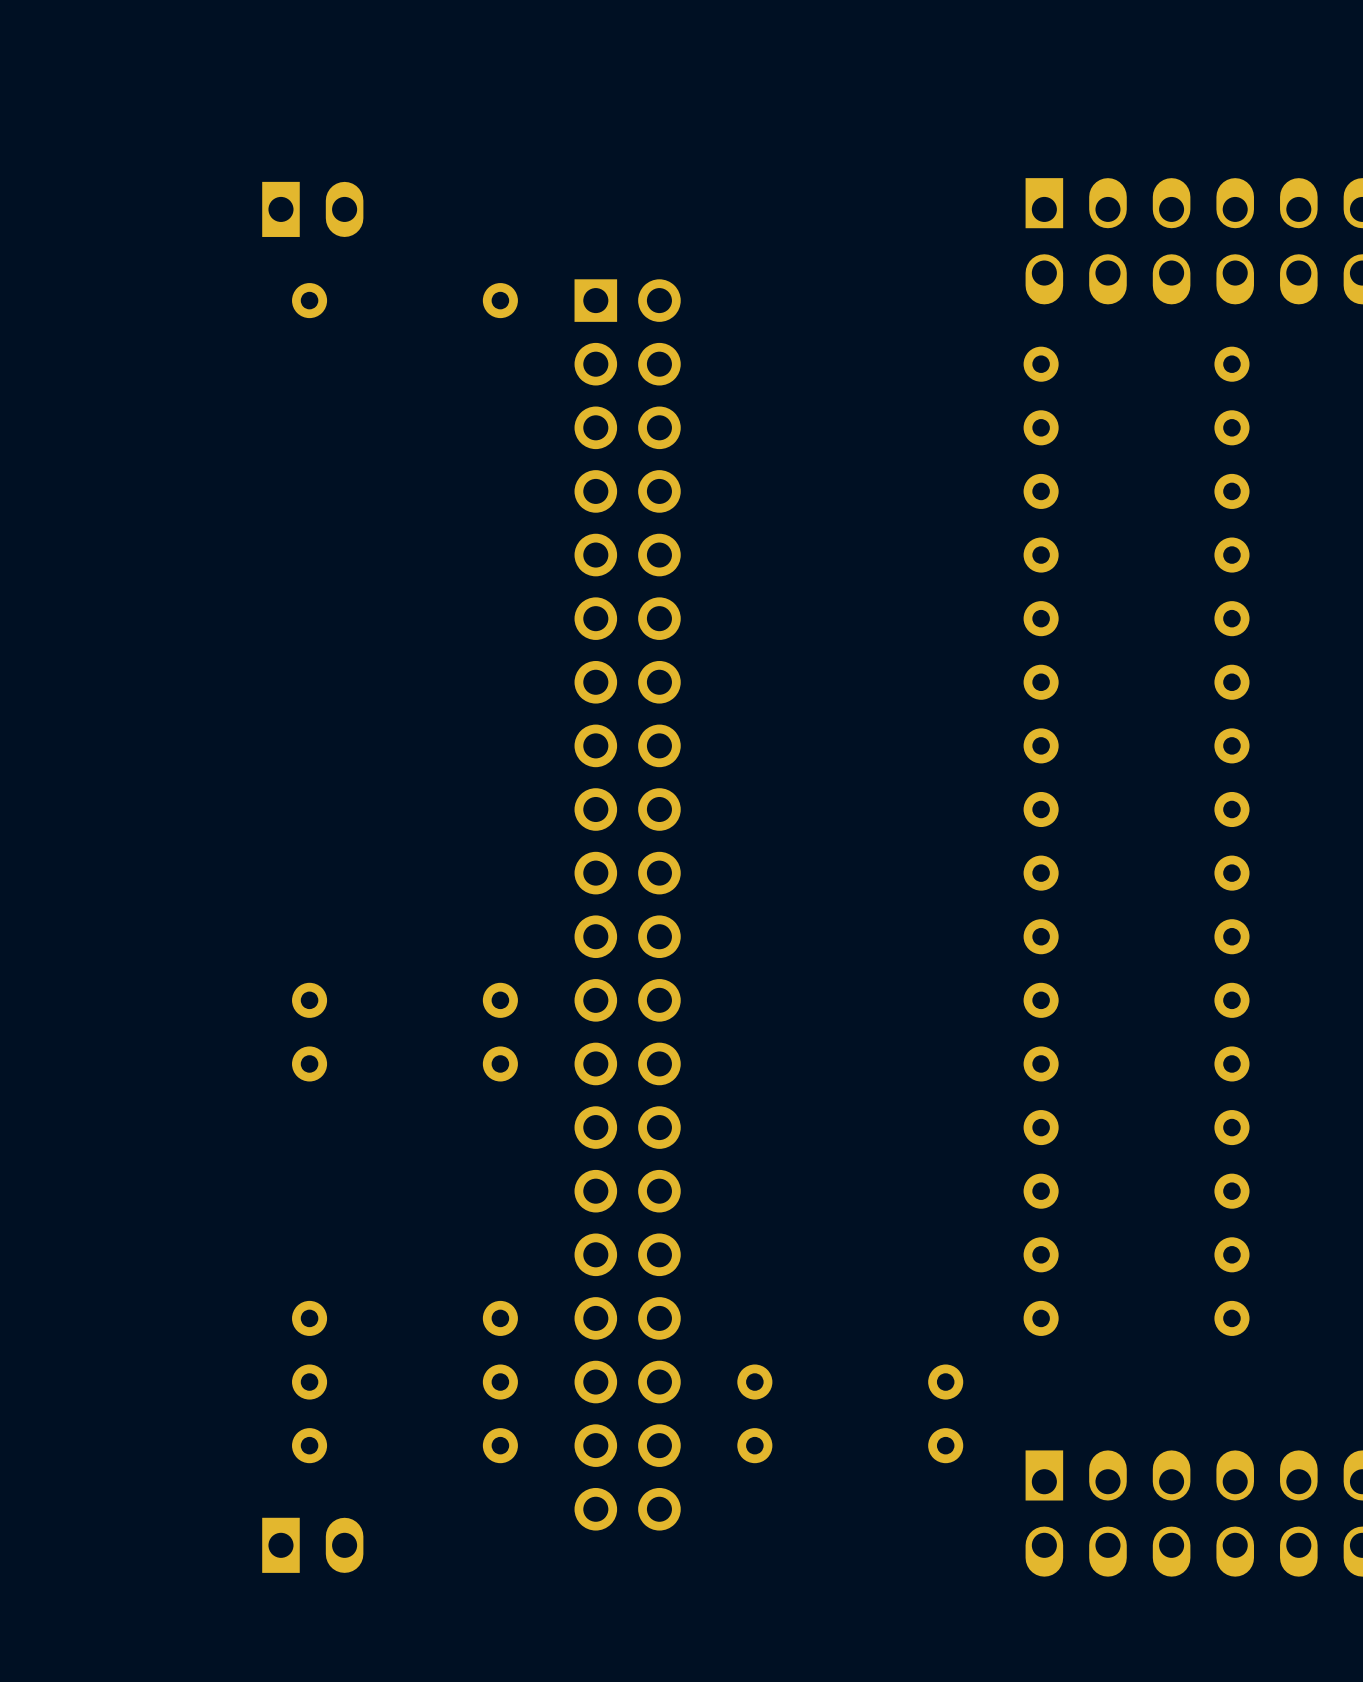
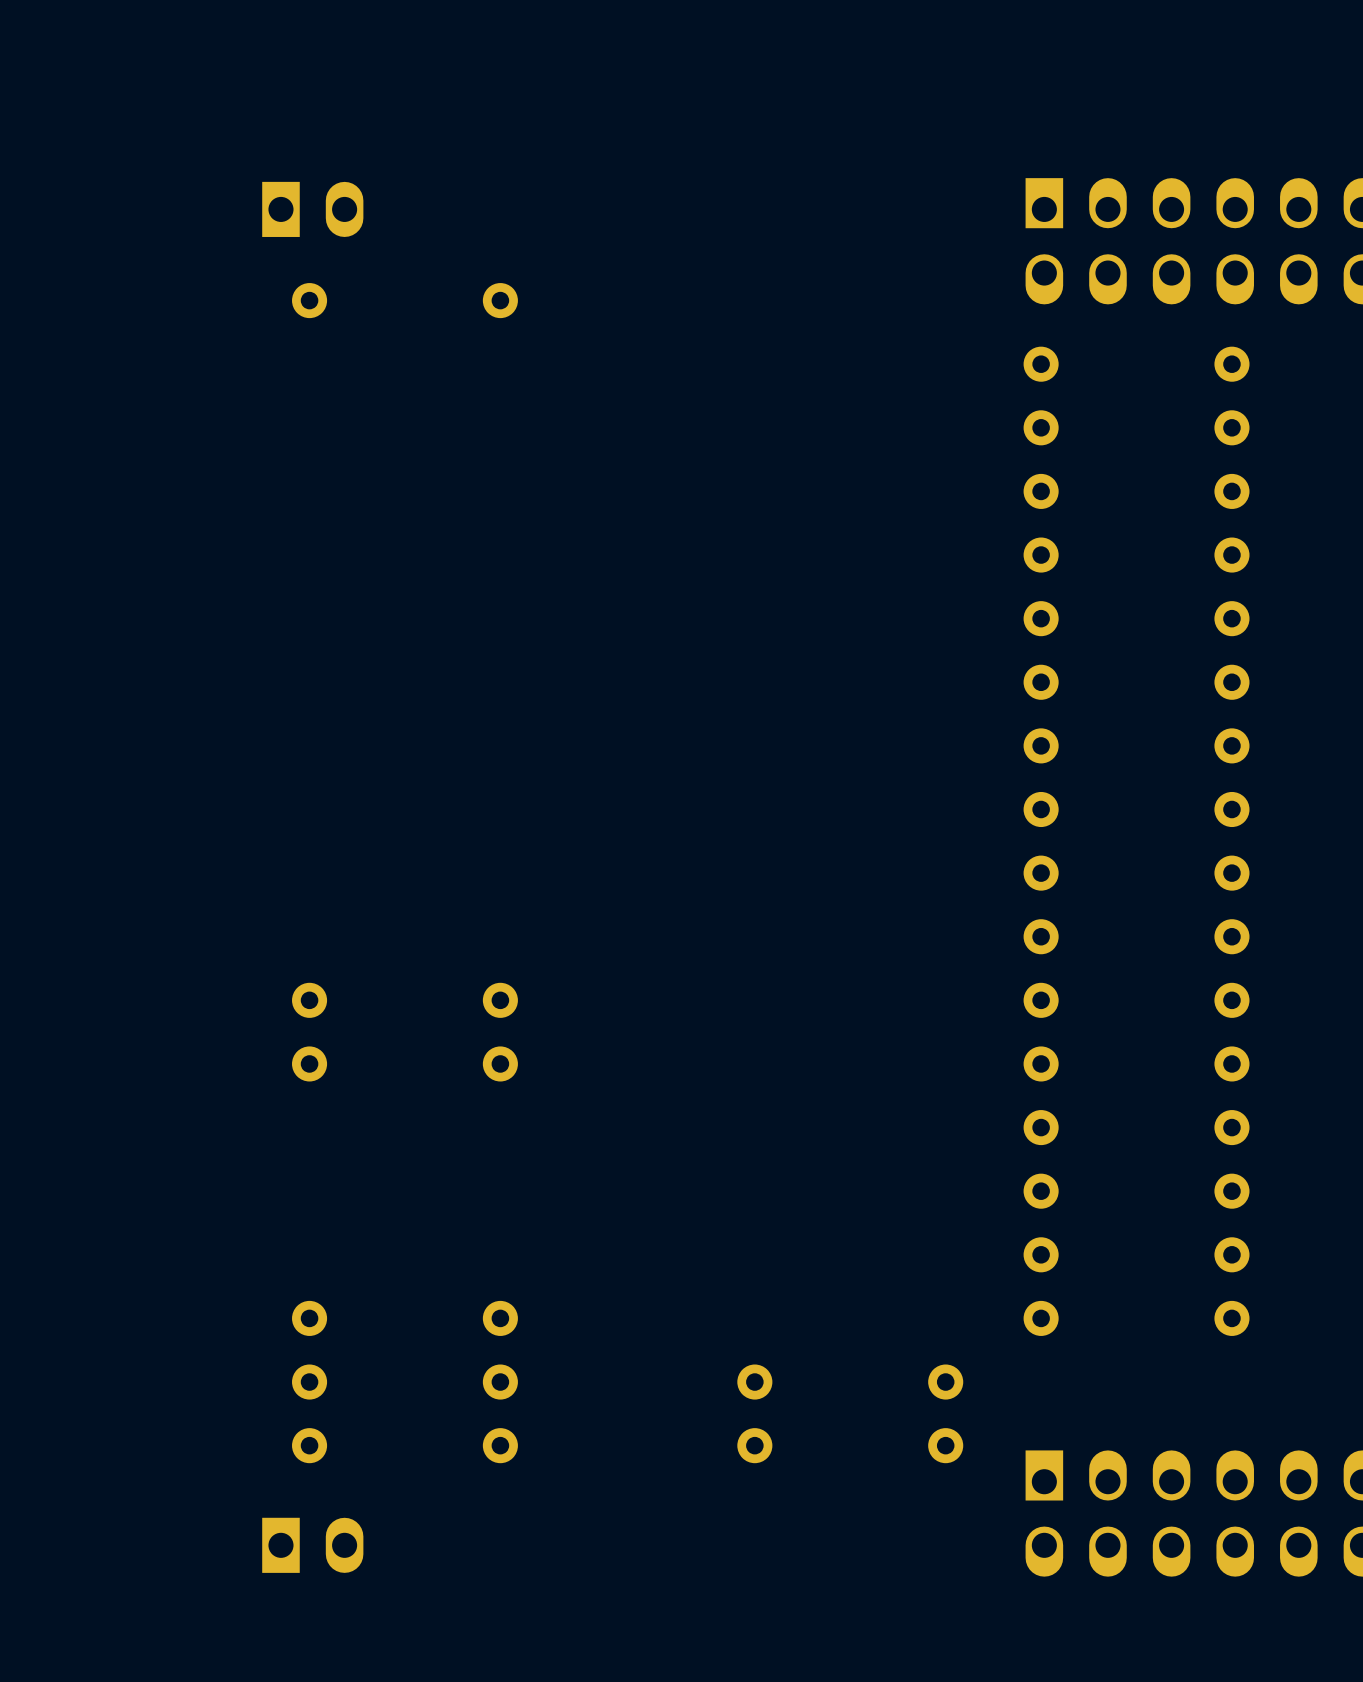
part: (627, 904) -> none

